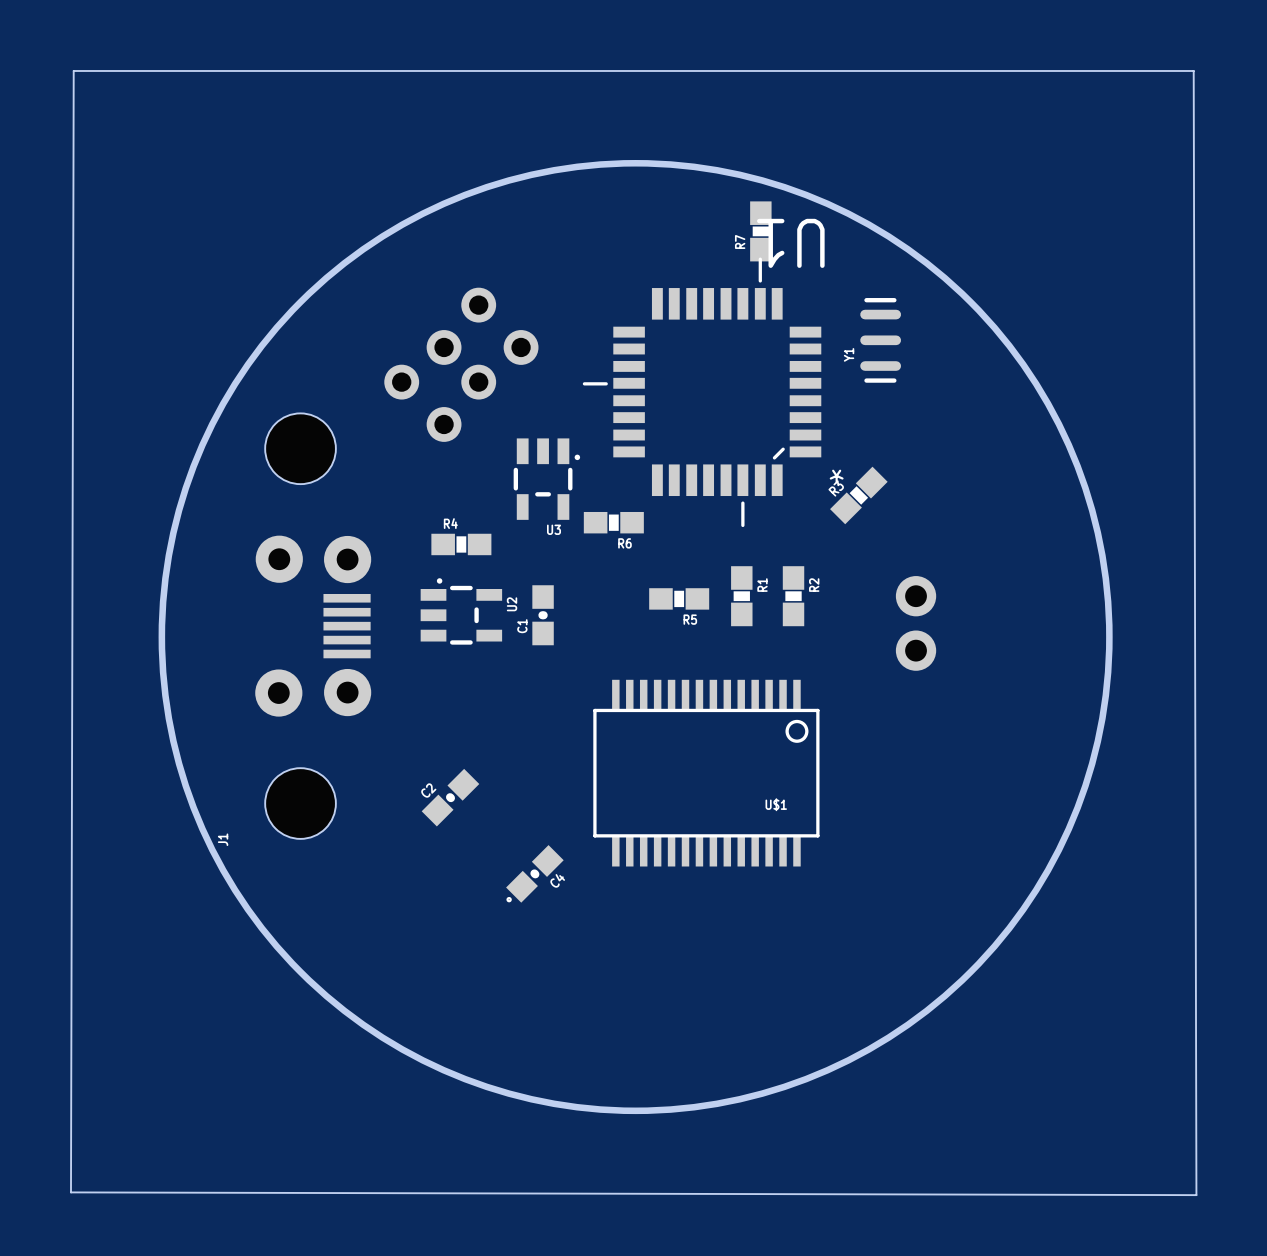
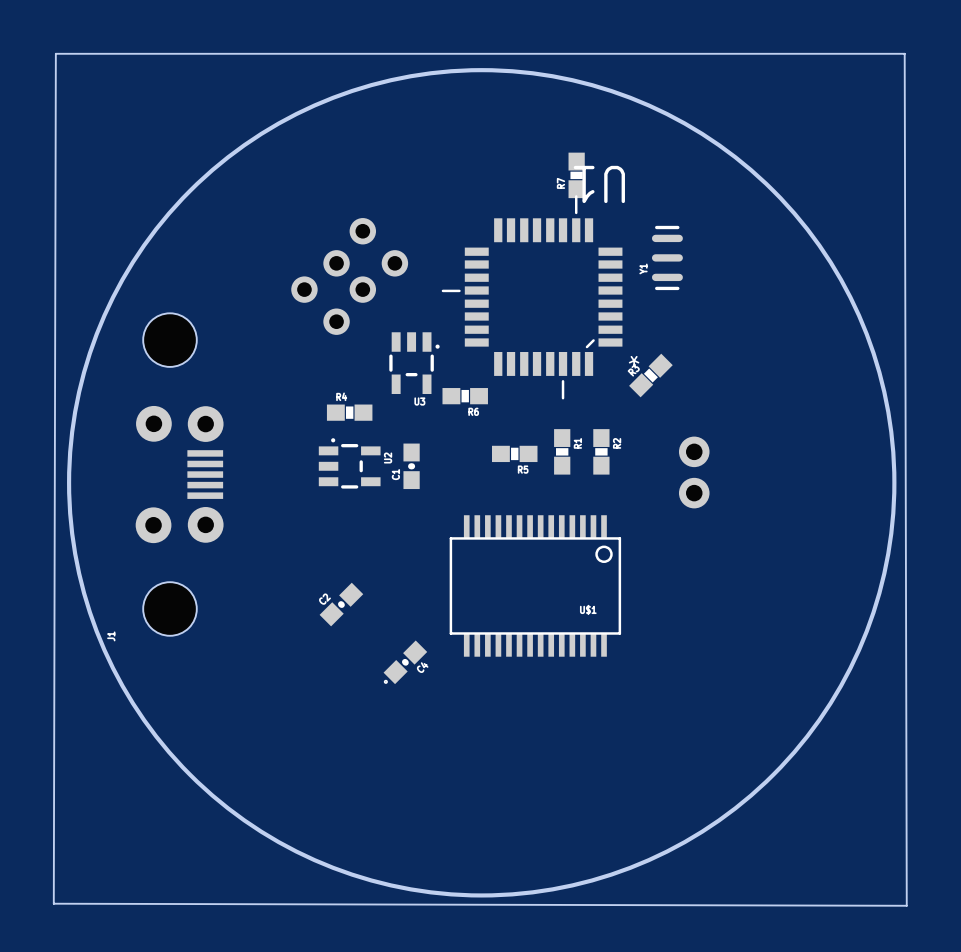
round board edge size: [158, 160, 1113, 1115] -> [67, 68, 897, 898]
J1 position: (313, 626) -> (179, 474)

